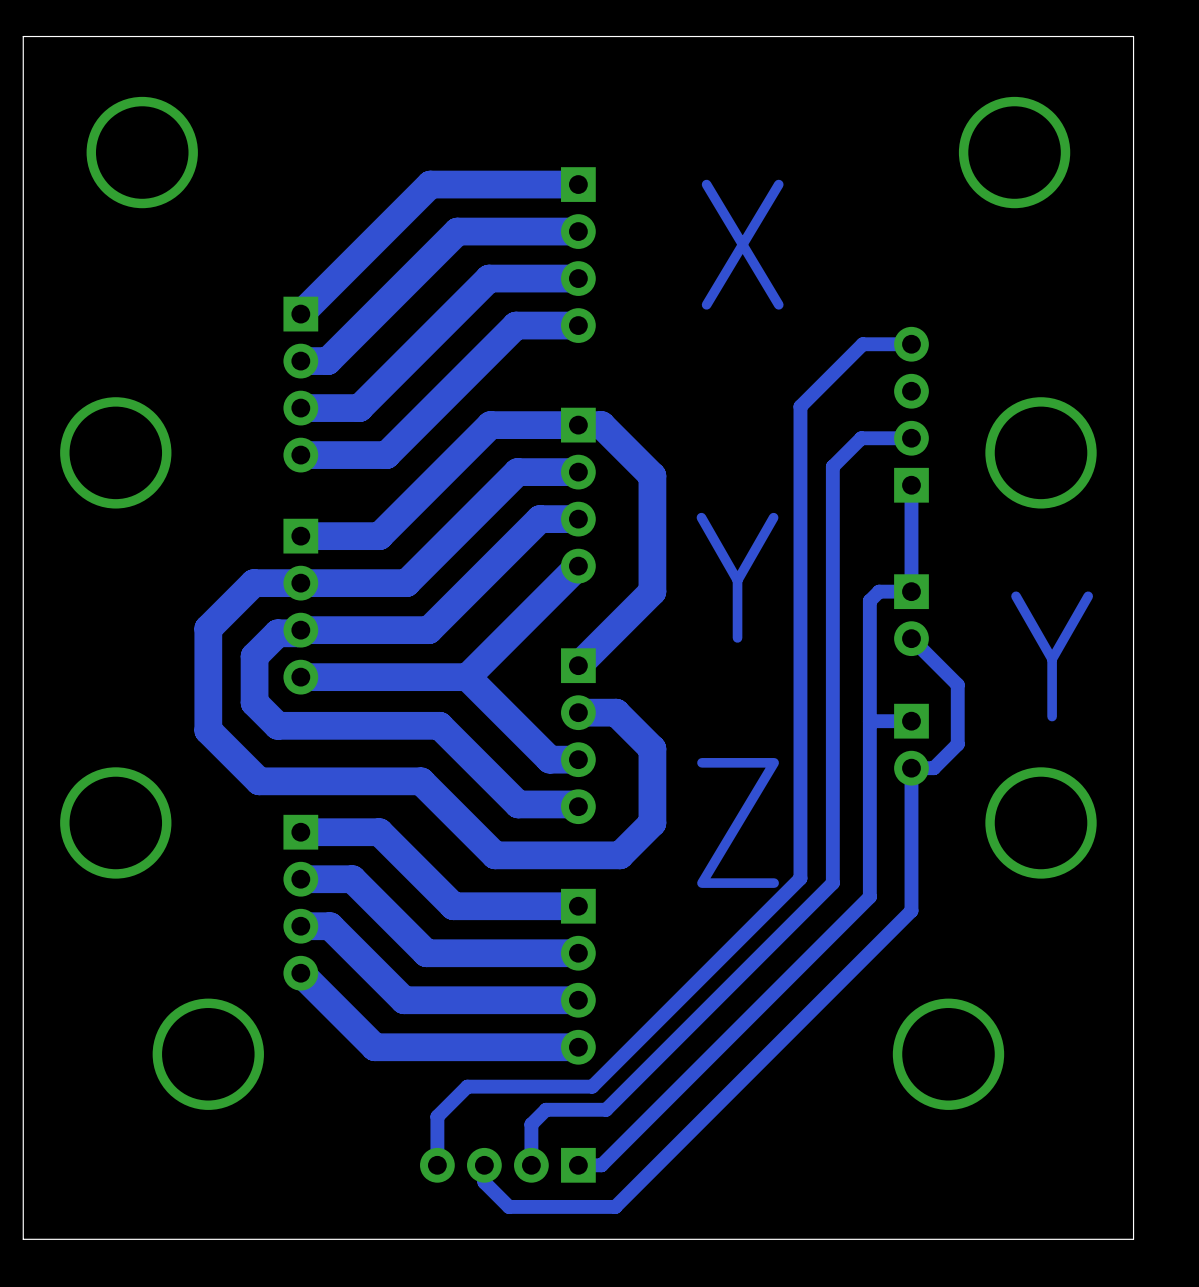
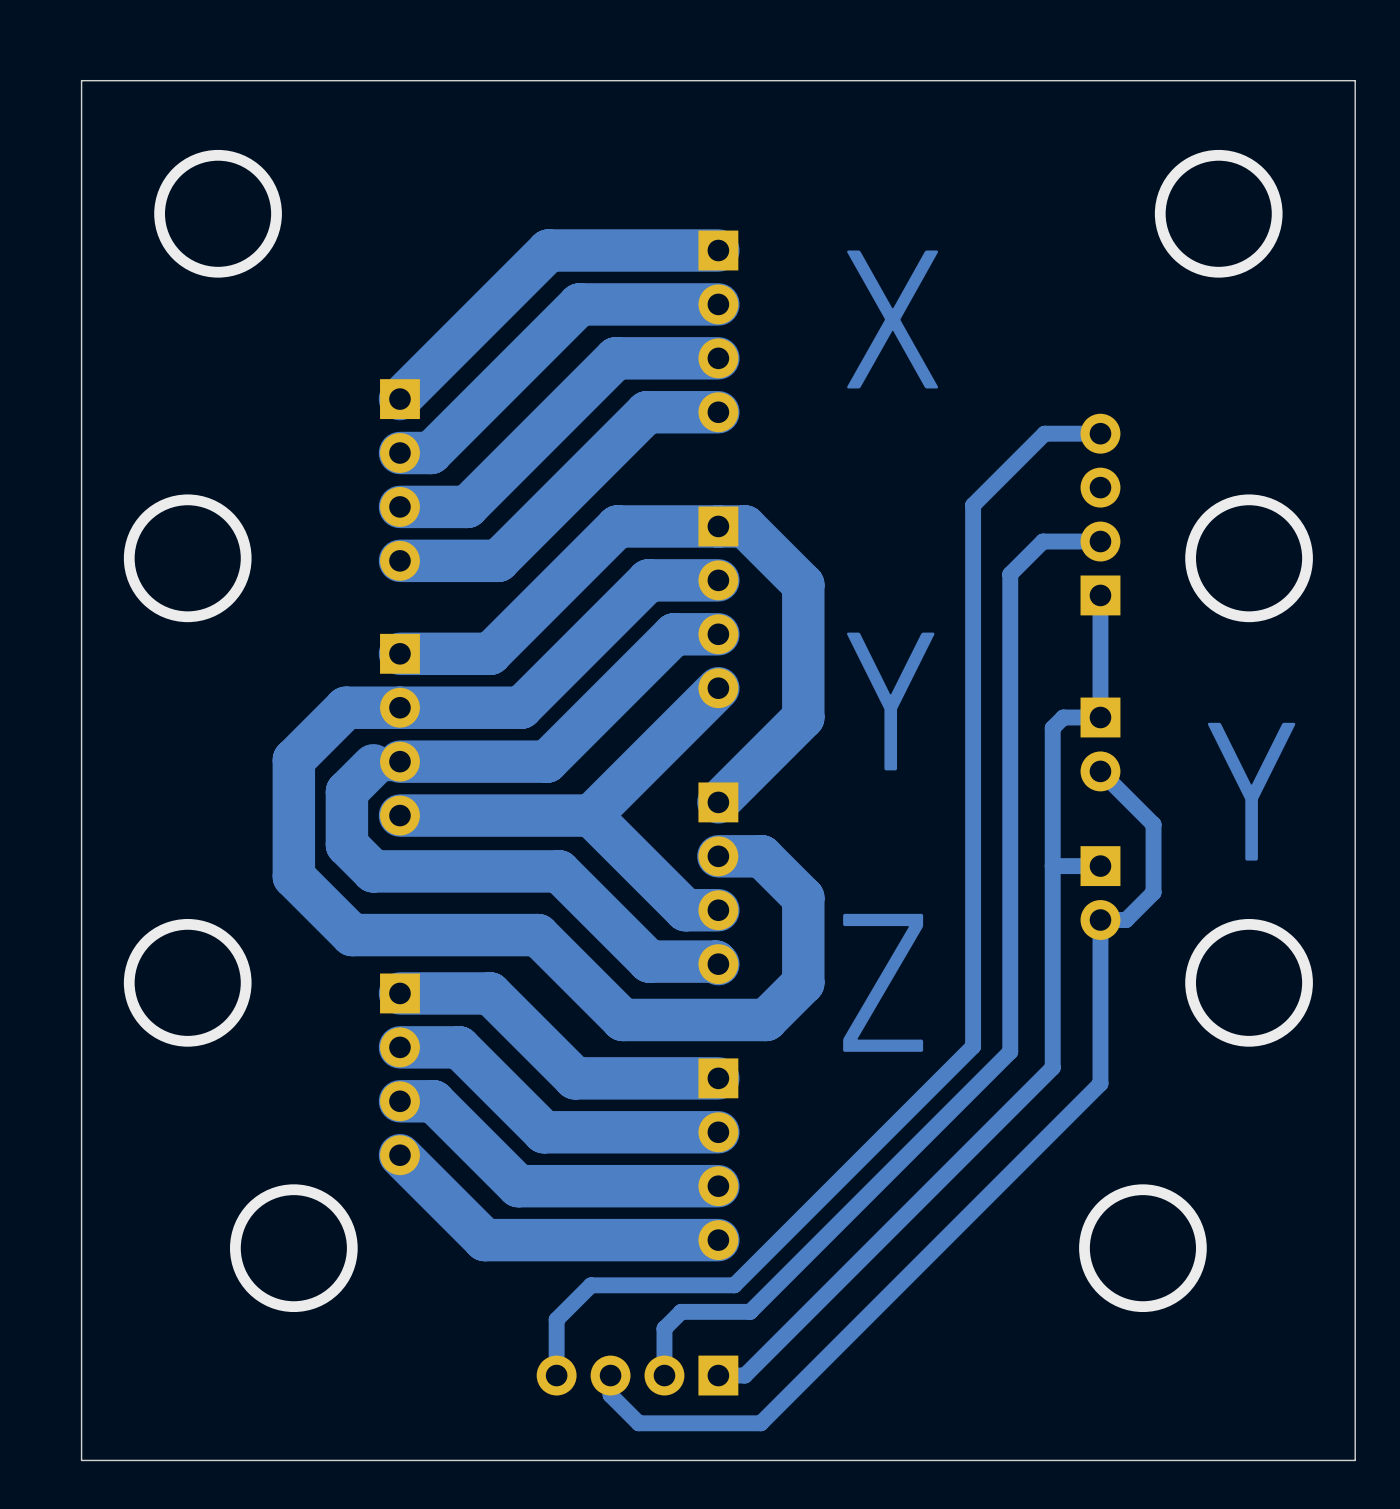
track width: thin (578, 184) (430, 184) (300, 314) -> thick (718, 250) (548, 250) (399, 399)
track width: thin (578, 231) (457, 231) (327, 361) (300, 361) -> thick (718, 304) (579, 304) (430, 453) (399, 453)
track width: thin (578, 278) (489, 278) (359, 408) (300, 408) -> thick (718, 358) (615, 358) (467, 506) (399, 506)
track width: thin (578, 325) (516, 325) (386, 455) (300, 455) -> thick (718, 412) (646, 412) (498, 560) (399, 560)
track width: thin (578, 472) (517, 472) (406, 583) (253, 583) (208, 628) (208, 730) (259, 781) (421, 781) (495, 855) (620, 855) (652, 822) (652, 748) (616, 712) (578, 712) -> thick (718, 580) (648, 580) (521, 707) (346, 707) (293, 759) (293, 876) (352, 935) (537, 935) (622, 1019) (766, 1019) (803, 982) (803, 897) (761, 856) (718, 856)
track width: thin (578, 519) (539, 519) (428, 630) (300, 630) -> thick (718, 634) (674, 634) (546, 761) (399, 761)
track width: thin (300, 536) (379, 536) (490, 425) (601, 425) (652, 476) (652, 591) (578, 665) -> thick (399, 653) (490, 653) (617, 526) (744, 526) (803, 584) (803, 717) (718, 802)
track width: thin (578, 566) (467, 677) -> thick (718, 688) (591, 815)
track width: thin (277, 633) (254, 656) (254, 702) (277, 725) (439, 725) (518, 804) (576, 804) (578, 806) -> thick (373, 765) (346, 791) (346, 844) (373, 871) (559, 871) (649, 961) (715, 961) (718, 964)
track width: thin (467, 677) (300, 677) -> thick (591, 815) (399, 815)
track width: thin (467, 677) (549, 759) (578, 759) -> thick (591, 815) (685, 910) (718, 910)
track width: thin (300, 832) (379, 832) (453, 906) (578, 906) -> thick (399, 993) (490, 993) (575, 1078) (718, 1078)
track width: thin (300, 879) (352, 879) (426, 953) (578, 953) -> thick (399, 1047) (459, 1047) (544, 1132) (718, 1132)
track width: thin (300, 926) (330, 926) (404, 1000) (578, 1000) -> thick (399, 1101) (433, 1101) (518, 1186) (718, 1186)
track width: thin (300, 973) (374, 1047) (578, 1047) -> thick (399, 1155) (484, 1240) (718, 1240)

